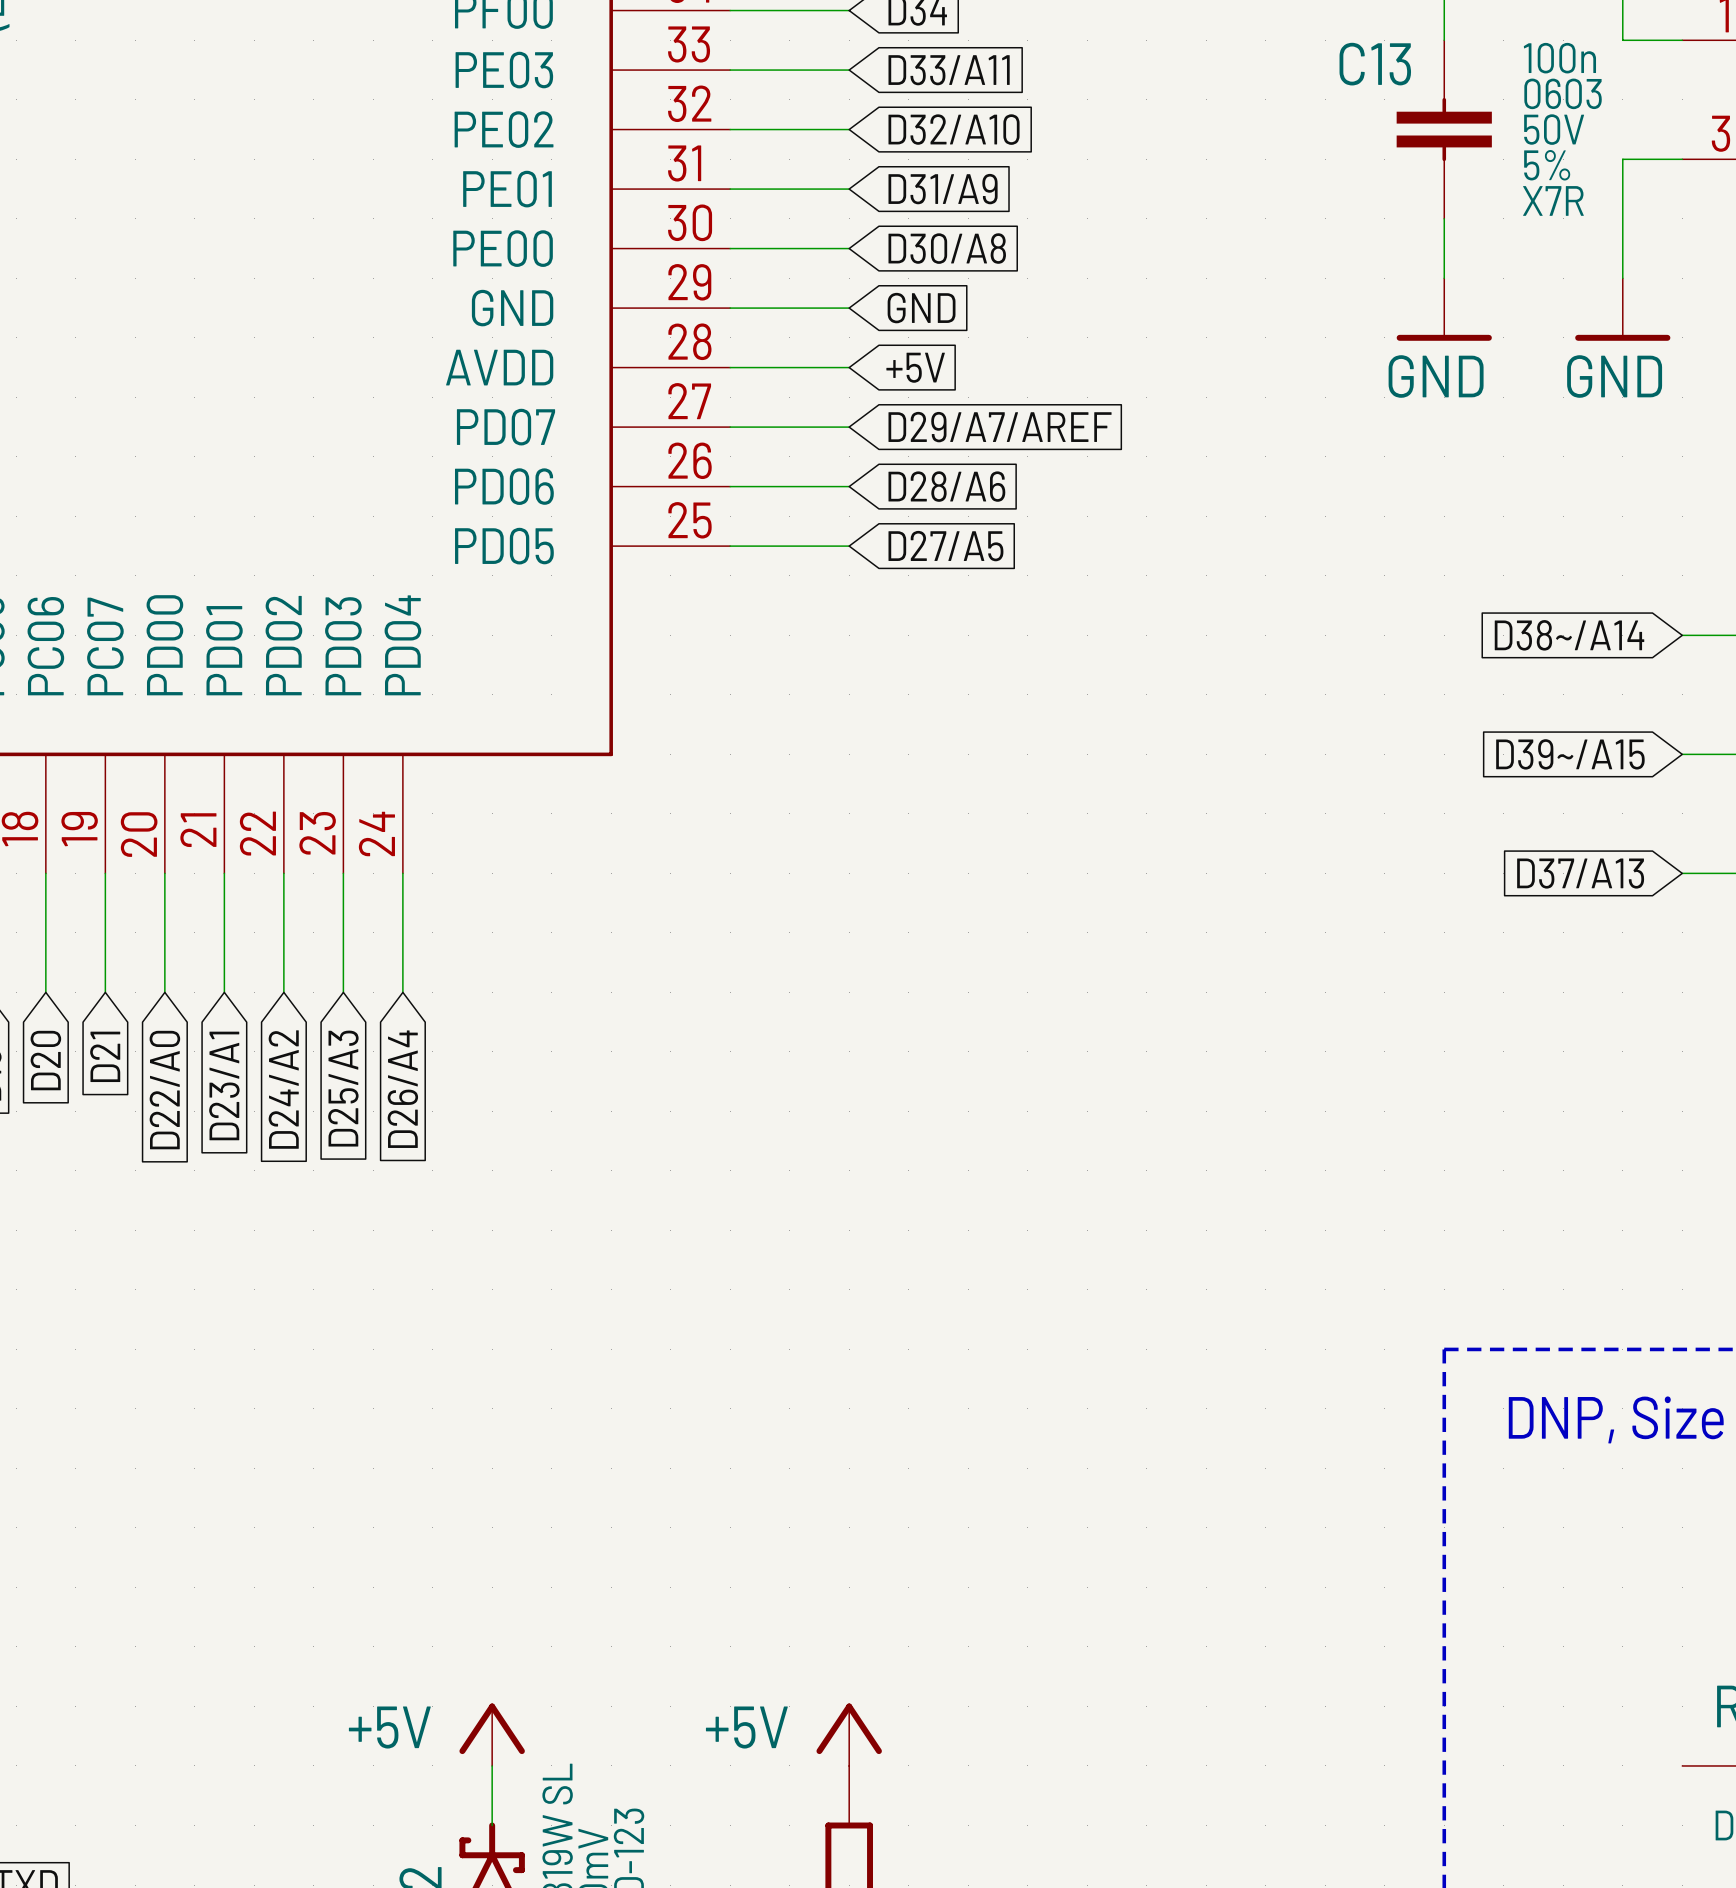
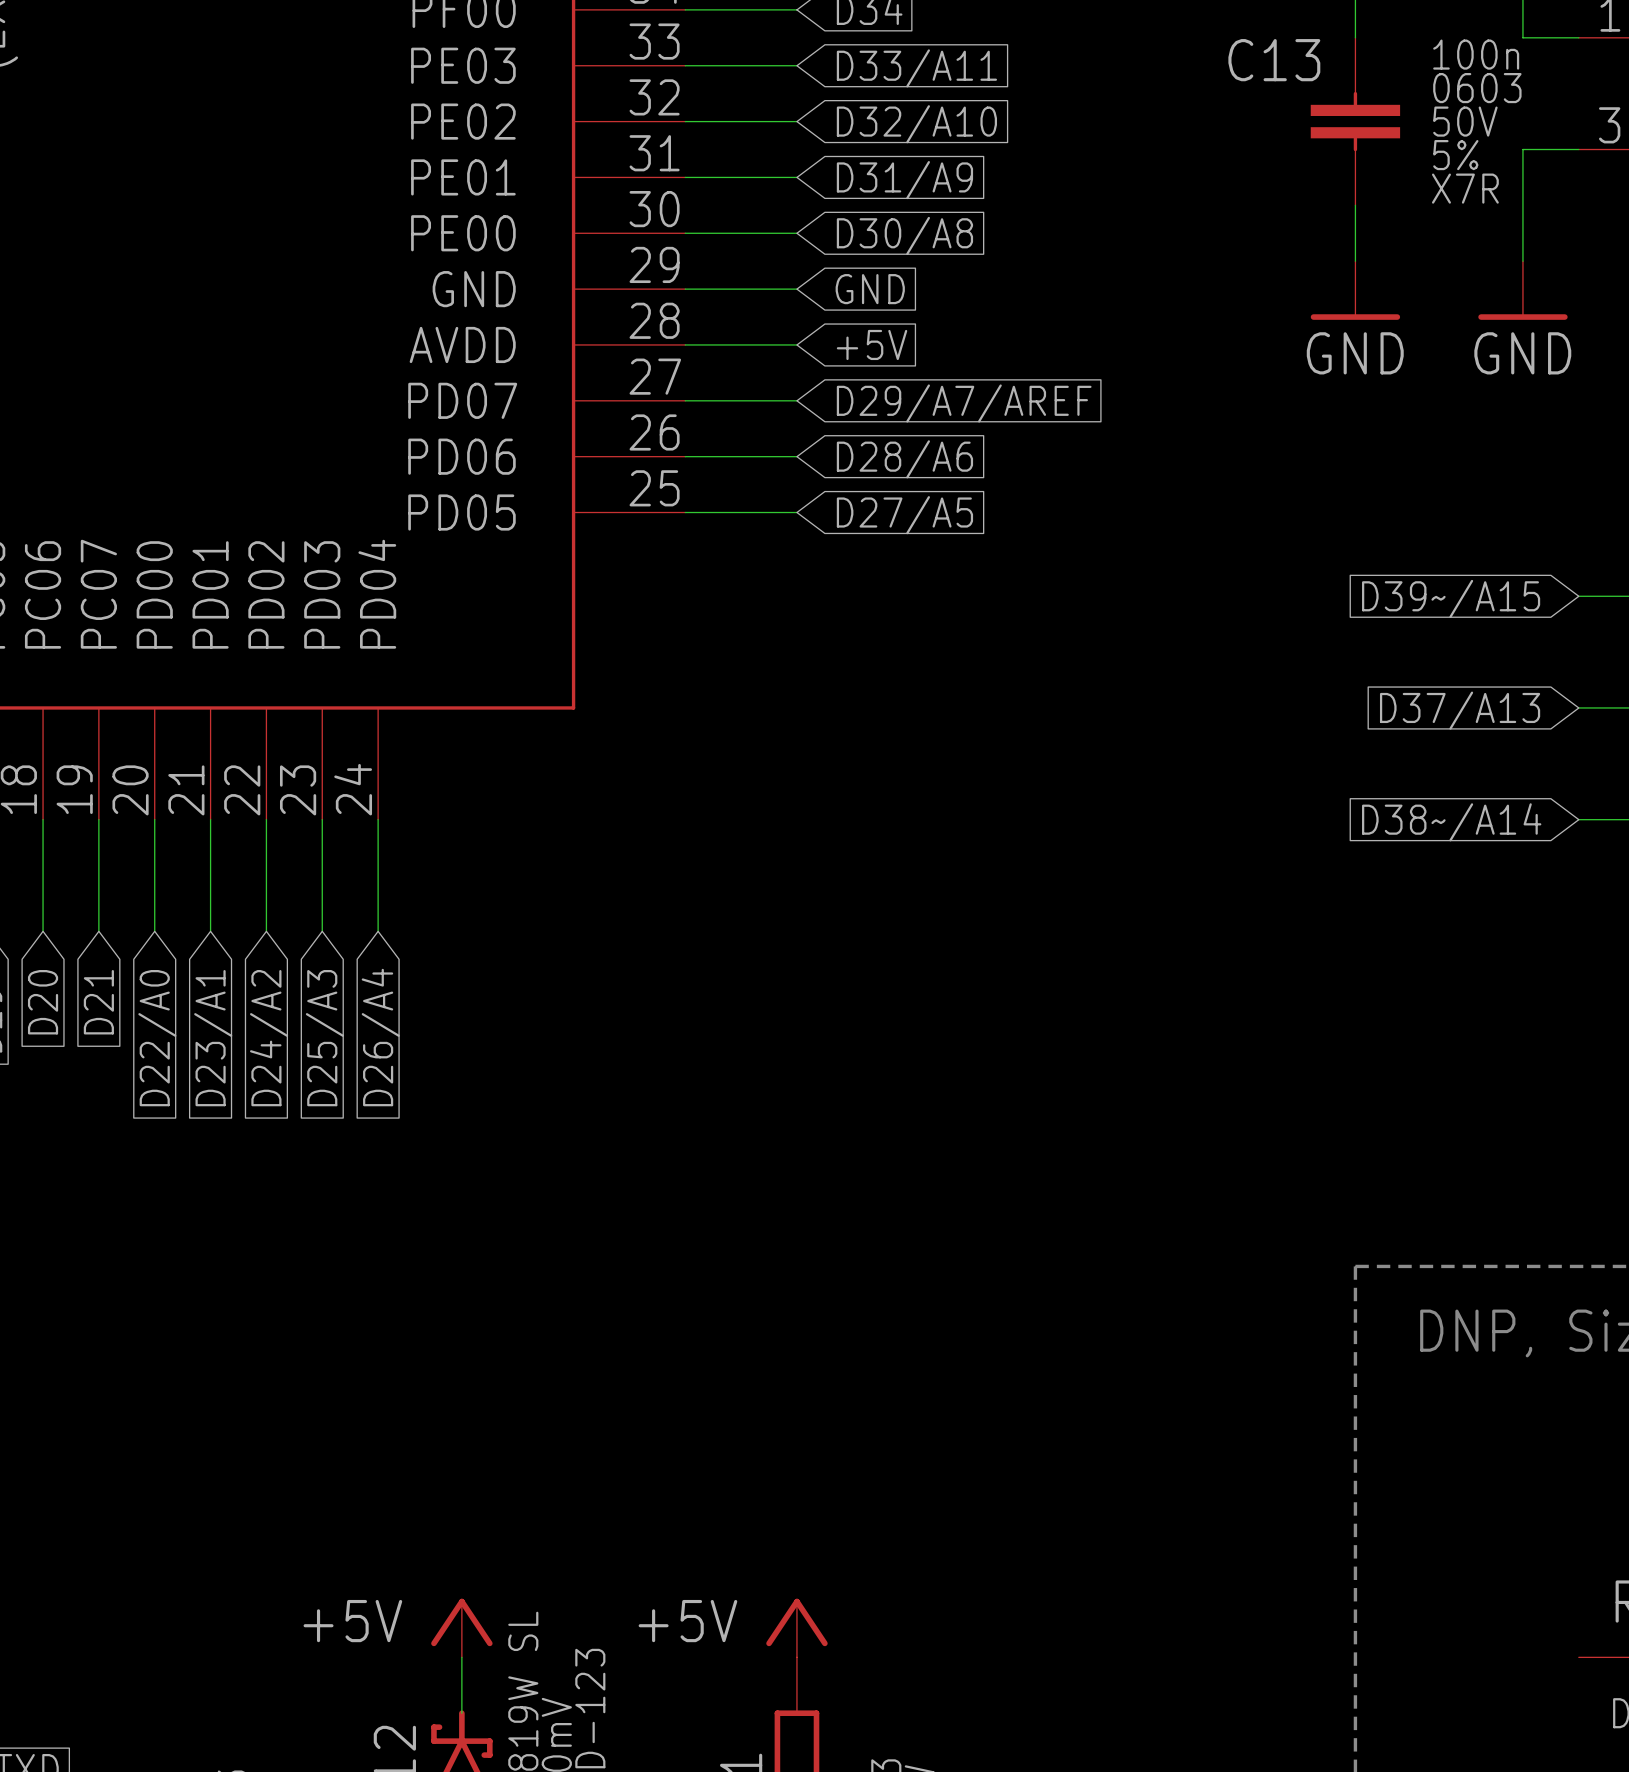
global label: D38~/A14 (1569, 635) -> D39~/A15 (1451, 598)
global label: D39~/A15 (1570, 754) -> D37/A13 (1460, 710)
global label: D37/A13 (1580, 873) -> D38~/A14 (1451, 822)

